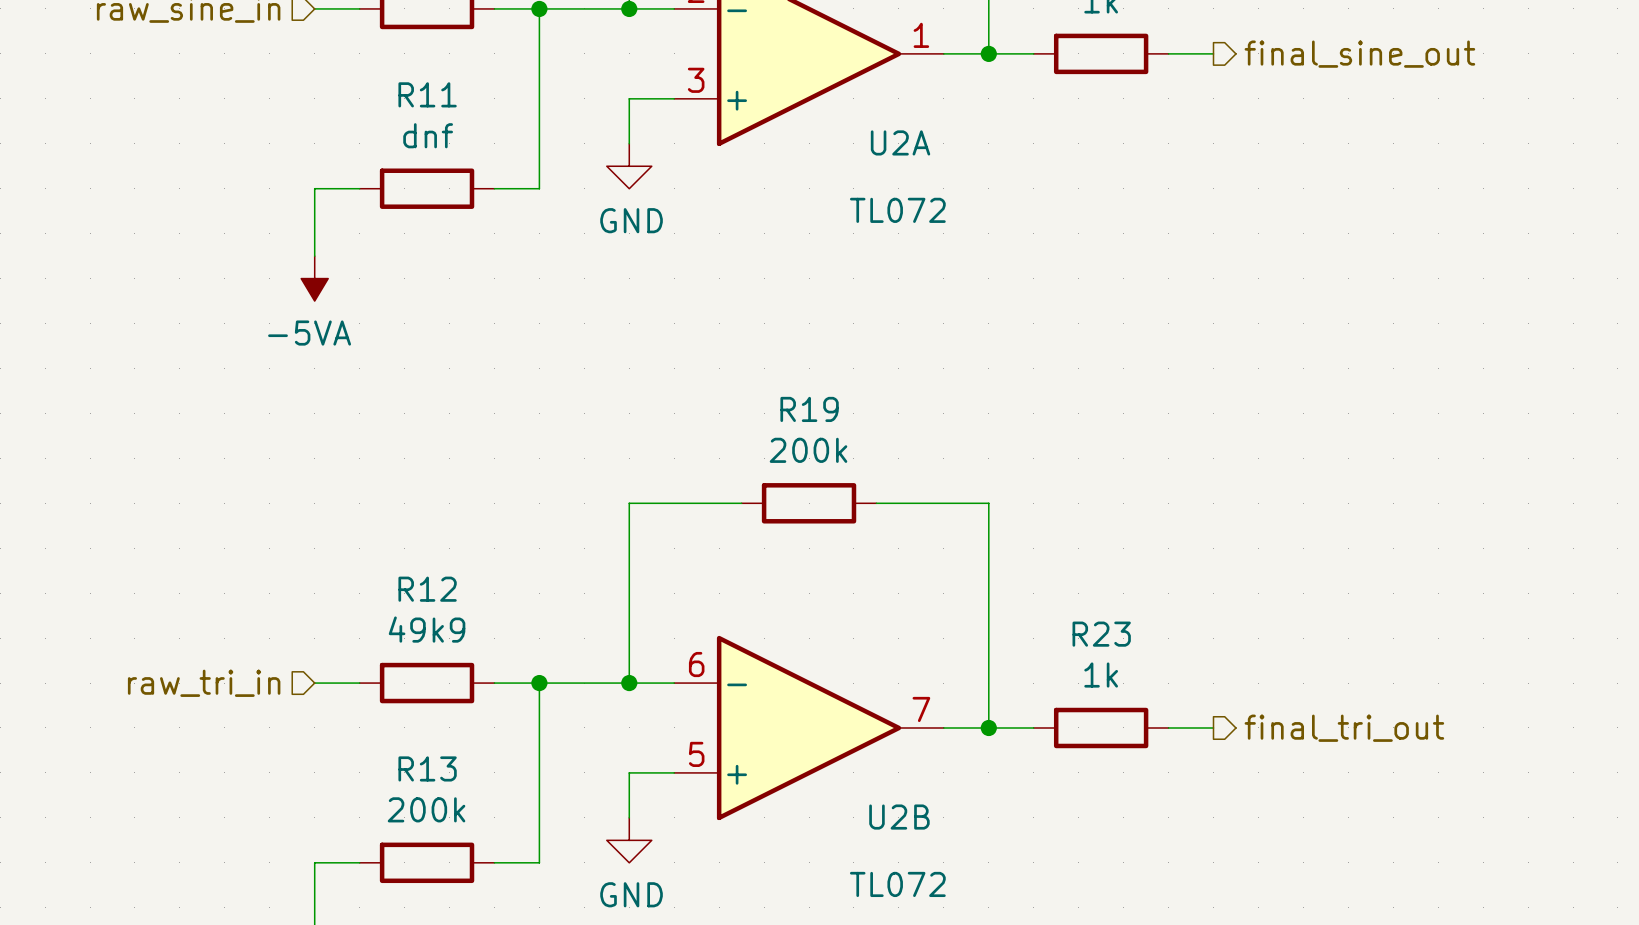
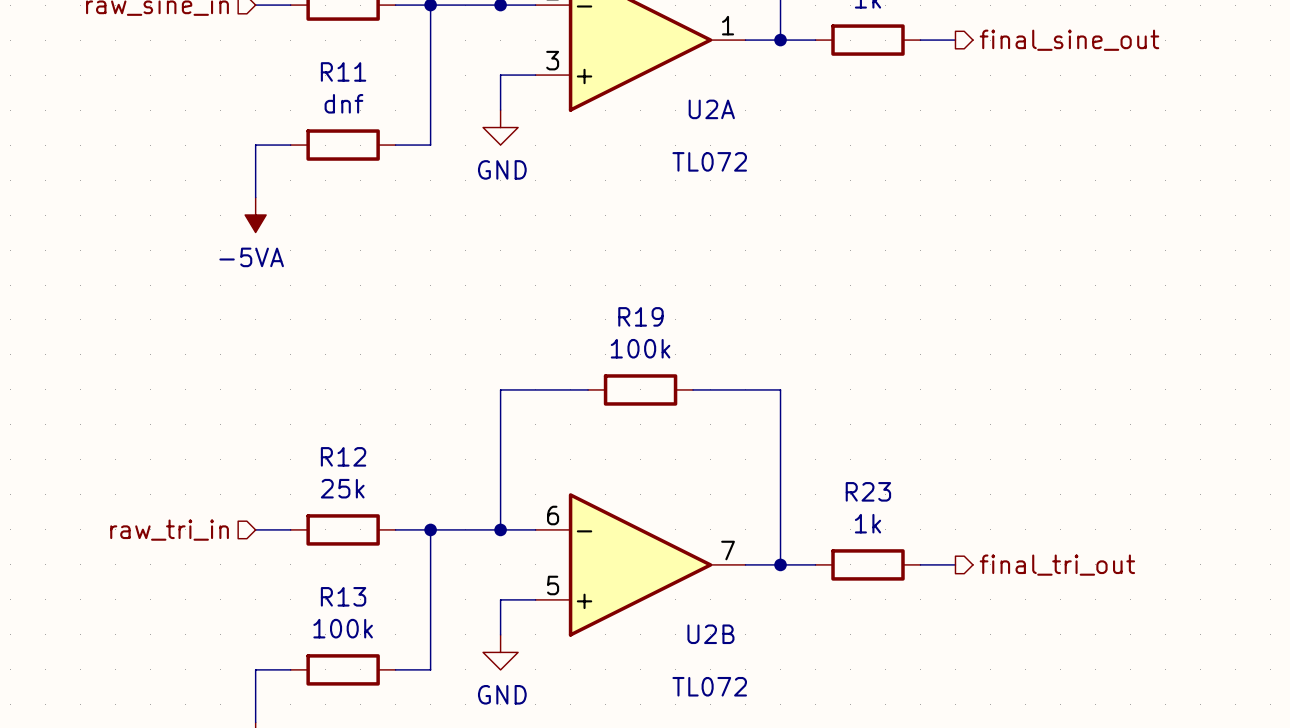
R19 value: 200k (808, 450) -> 100k (640, 348)
R12 value: 49k9 (427, 629) -> 25k (342, 488)
R13 value: 200k (426, 809) -> 100k (343, 628)

